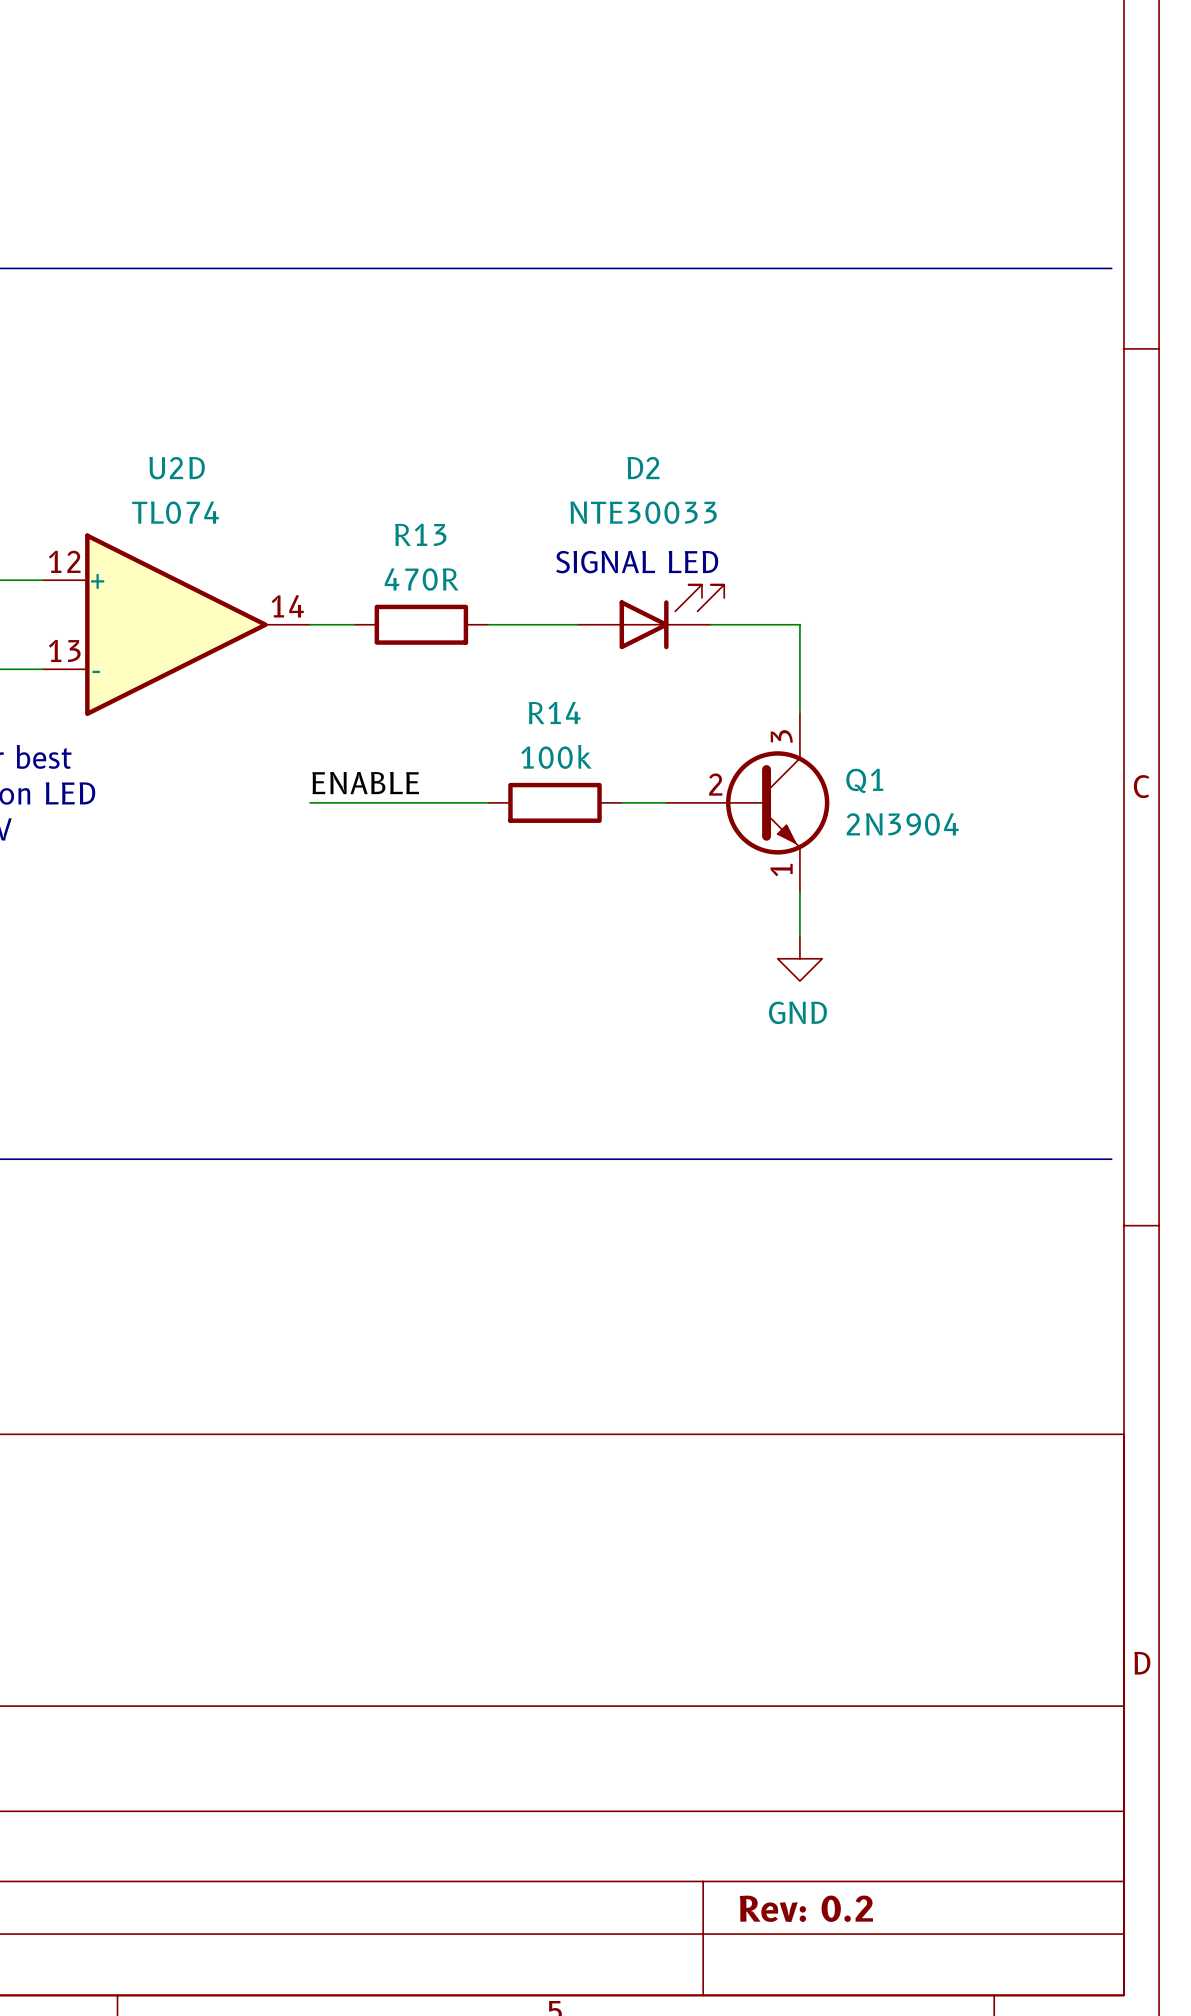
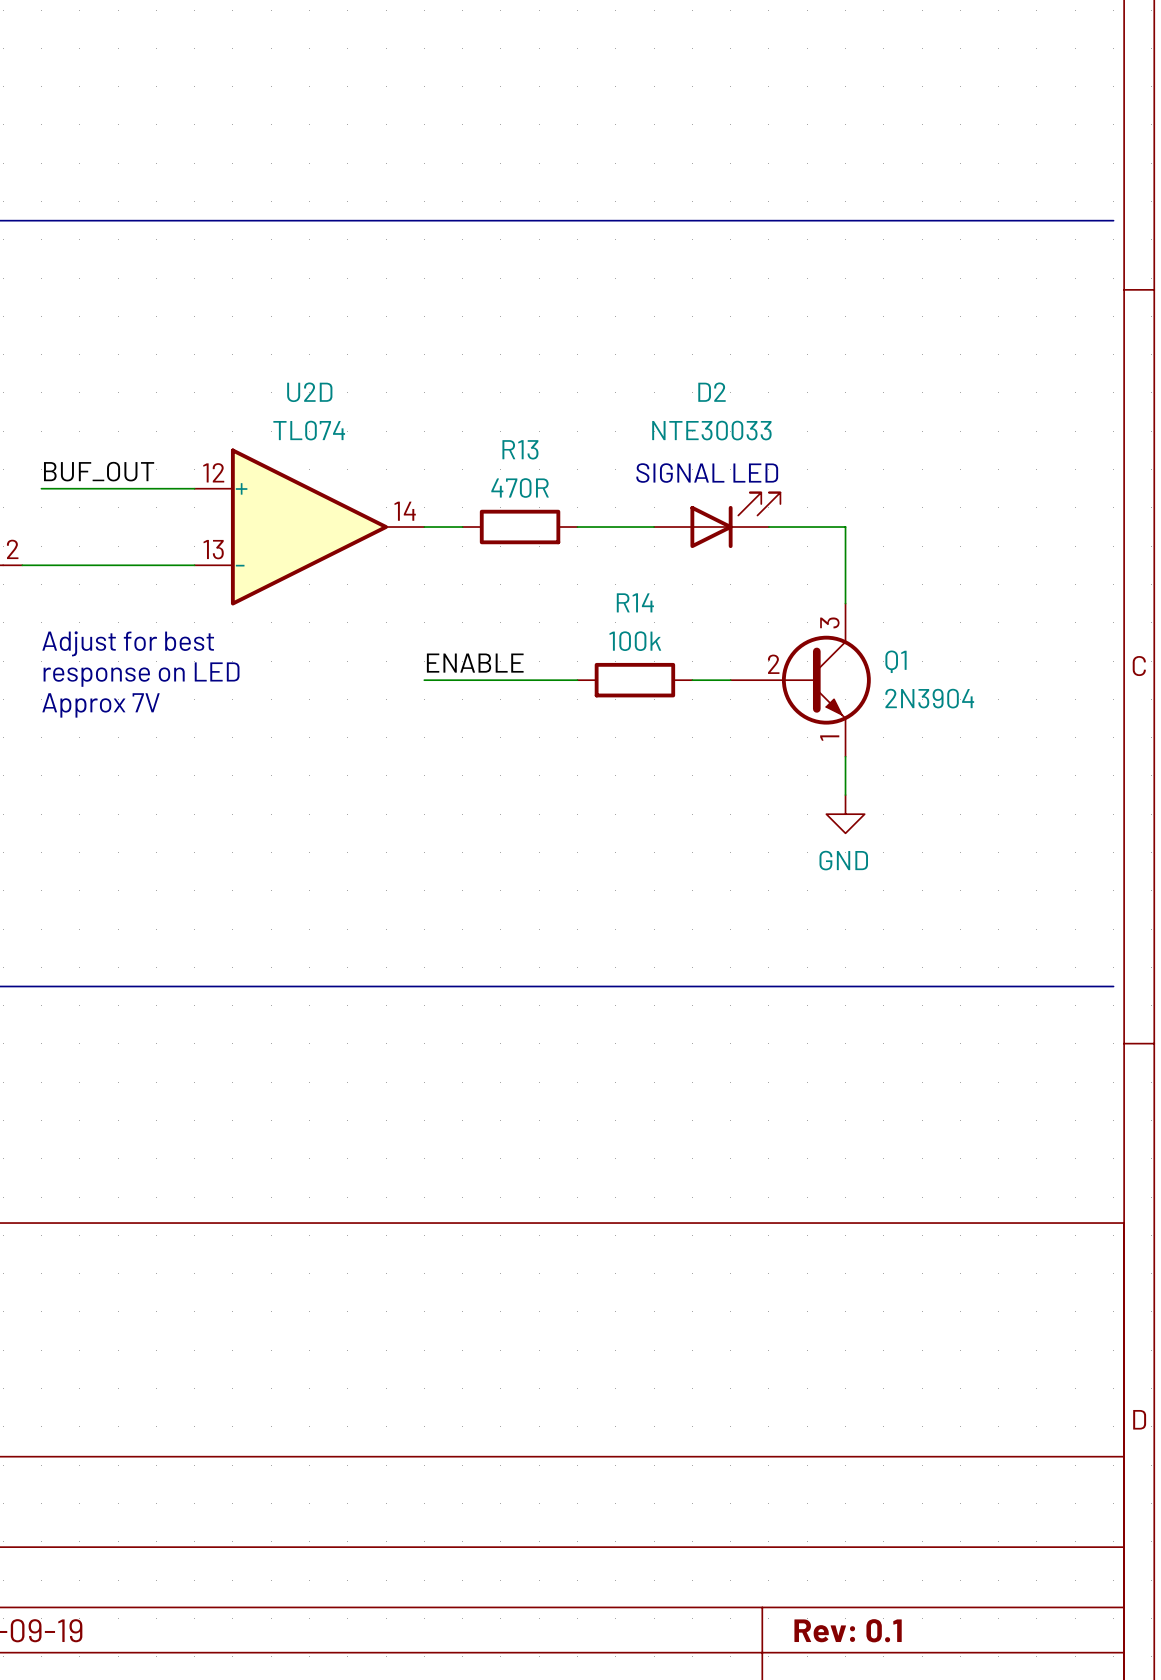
title block: Rev: 0.2 (806, 1908) -> Rev: 0.1 (848, 1630)

